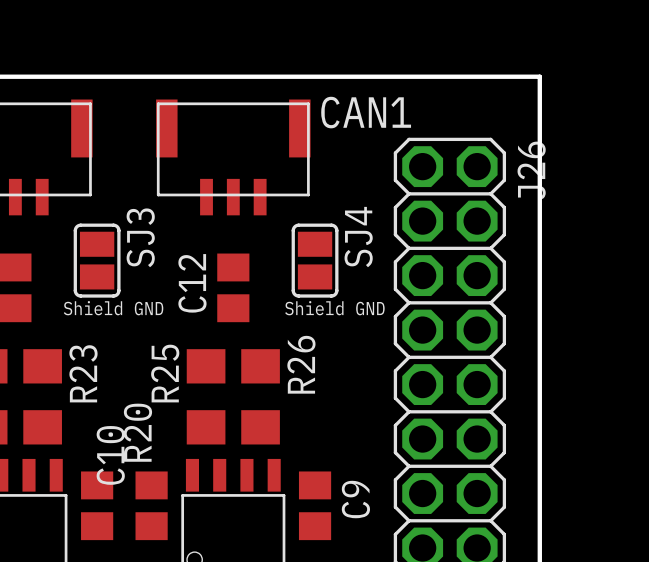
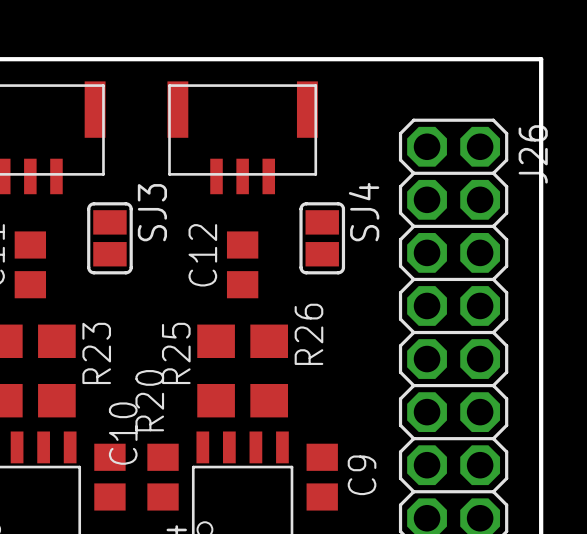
text: CAN1 (366, 112) -> none
text: Shield GND (113, 308) -> none
text: Shield GND (334, 308) -> none

